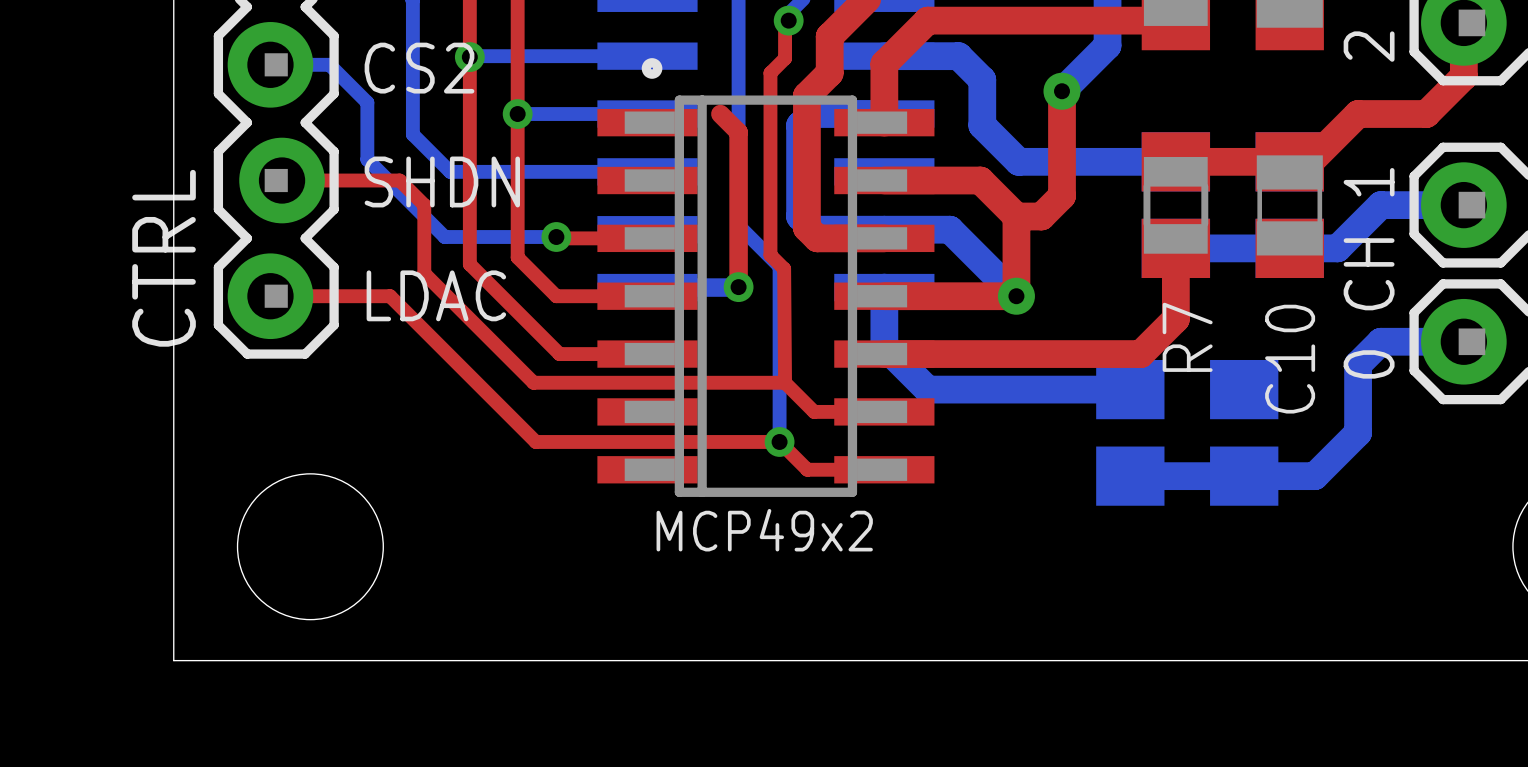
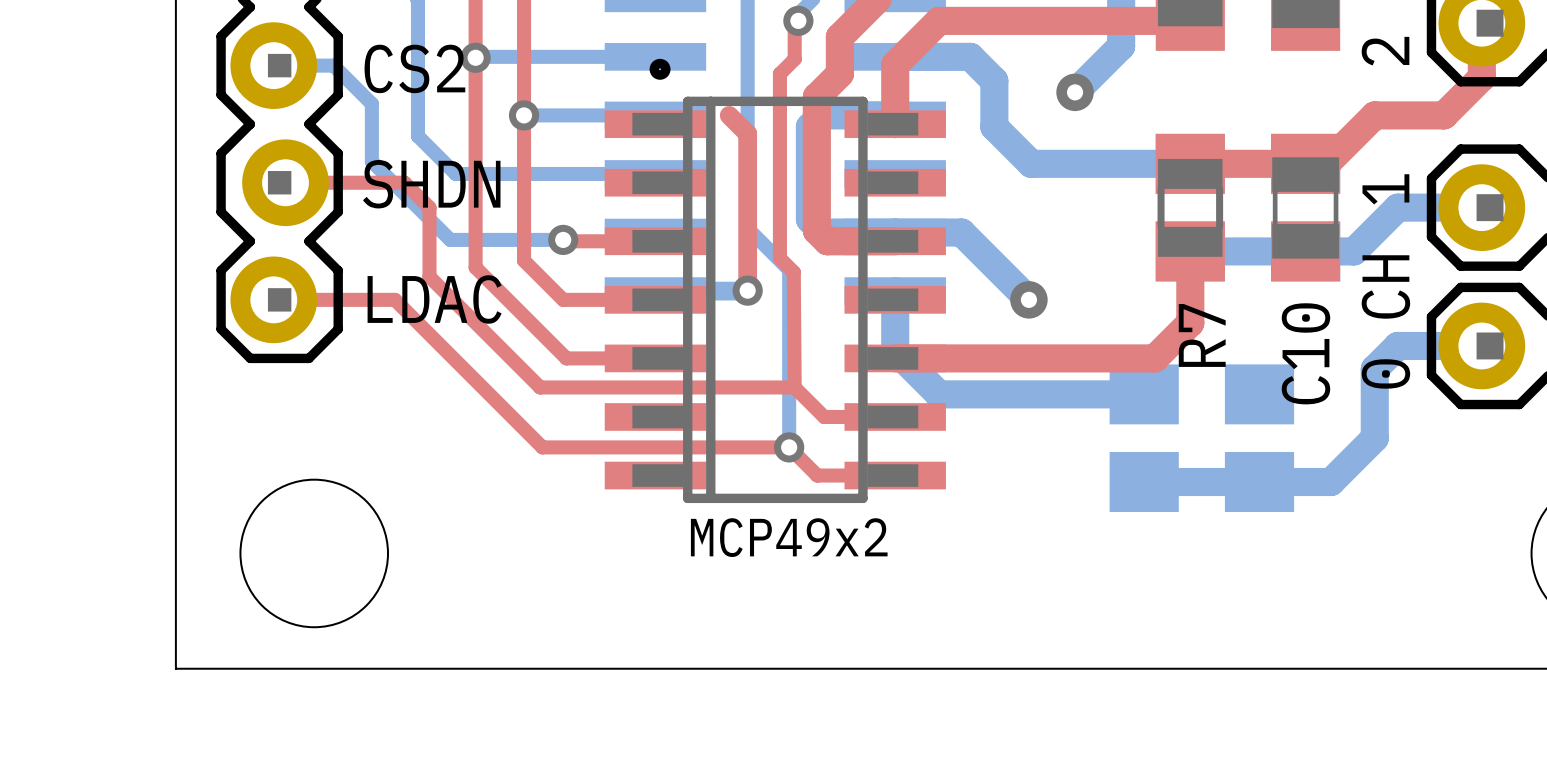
top track: (1062, 91) (1062, 196) (1041, 216) (1016, 216) -> none
top track: (884, 180) (980, 180) (1016, 216) -> none
top track: (1016, 216) (1016, 296) (884, 296) -> none
CTRL name: CTRL (164, 258) -> none

